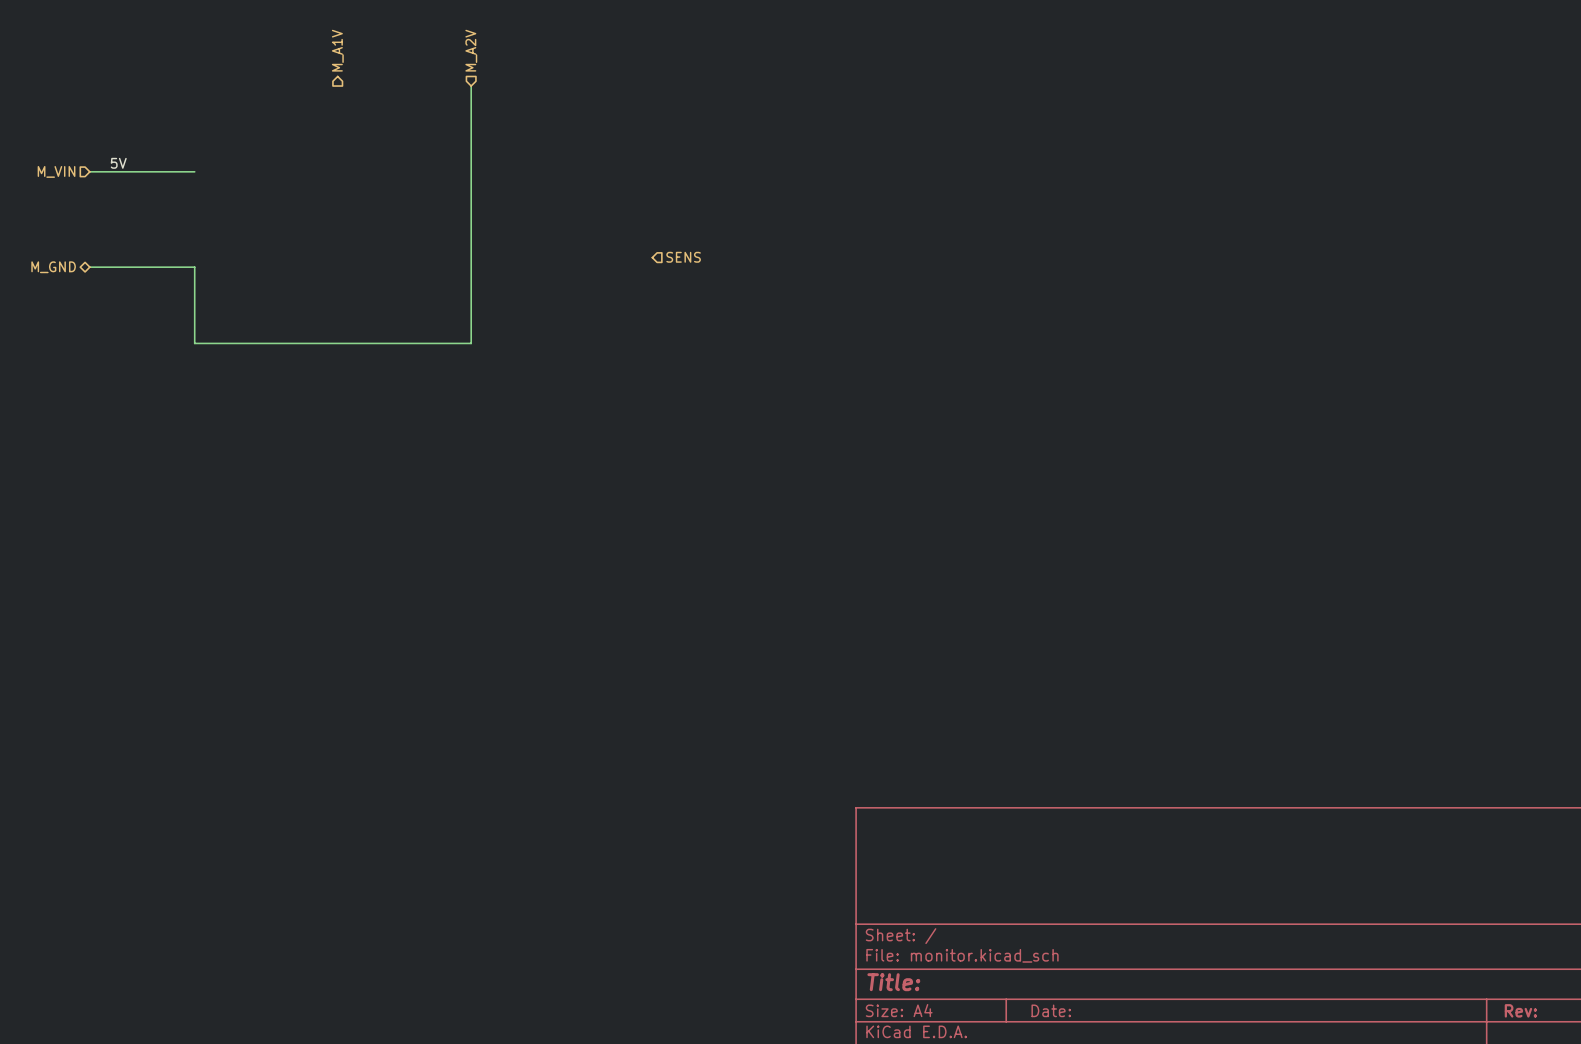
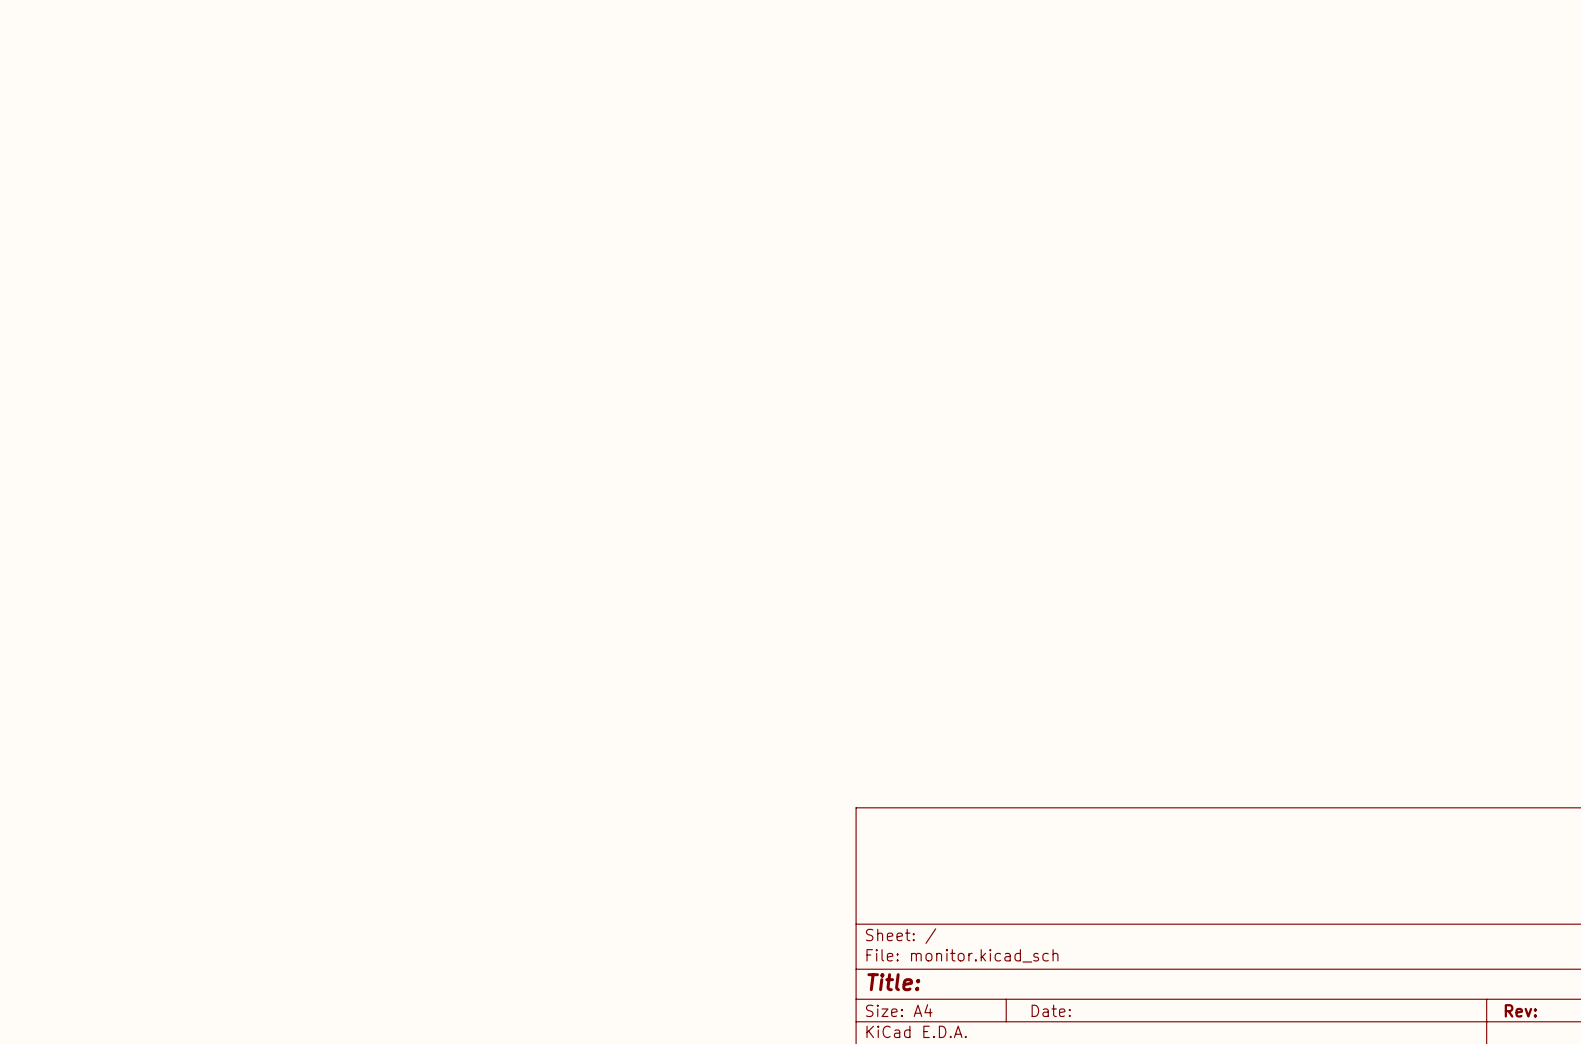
hierarchical label: M_A1V (337, 50) -> none
hierarchical label: M_A2V (471, 50) -> none
wire: (471, 86) (471, 343) (194, 343) (194, 267) (89, 267) -> none
label: 5V (118, 163) -> none
hierarchical label: M_VIN (56, 171) -> none
wire: (89, 171) (194, 171) -> none
hierarchical label: SENS (683, 257) -> none
hierarchical label: M_GND (53, 267) -> none

